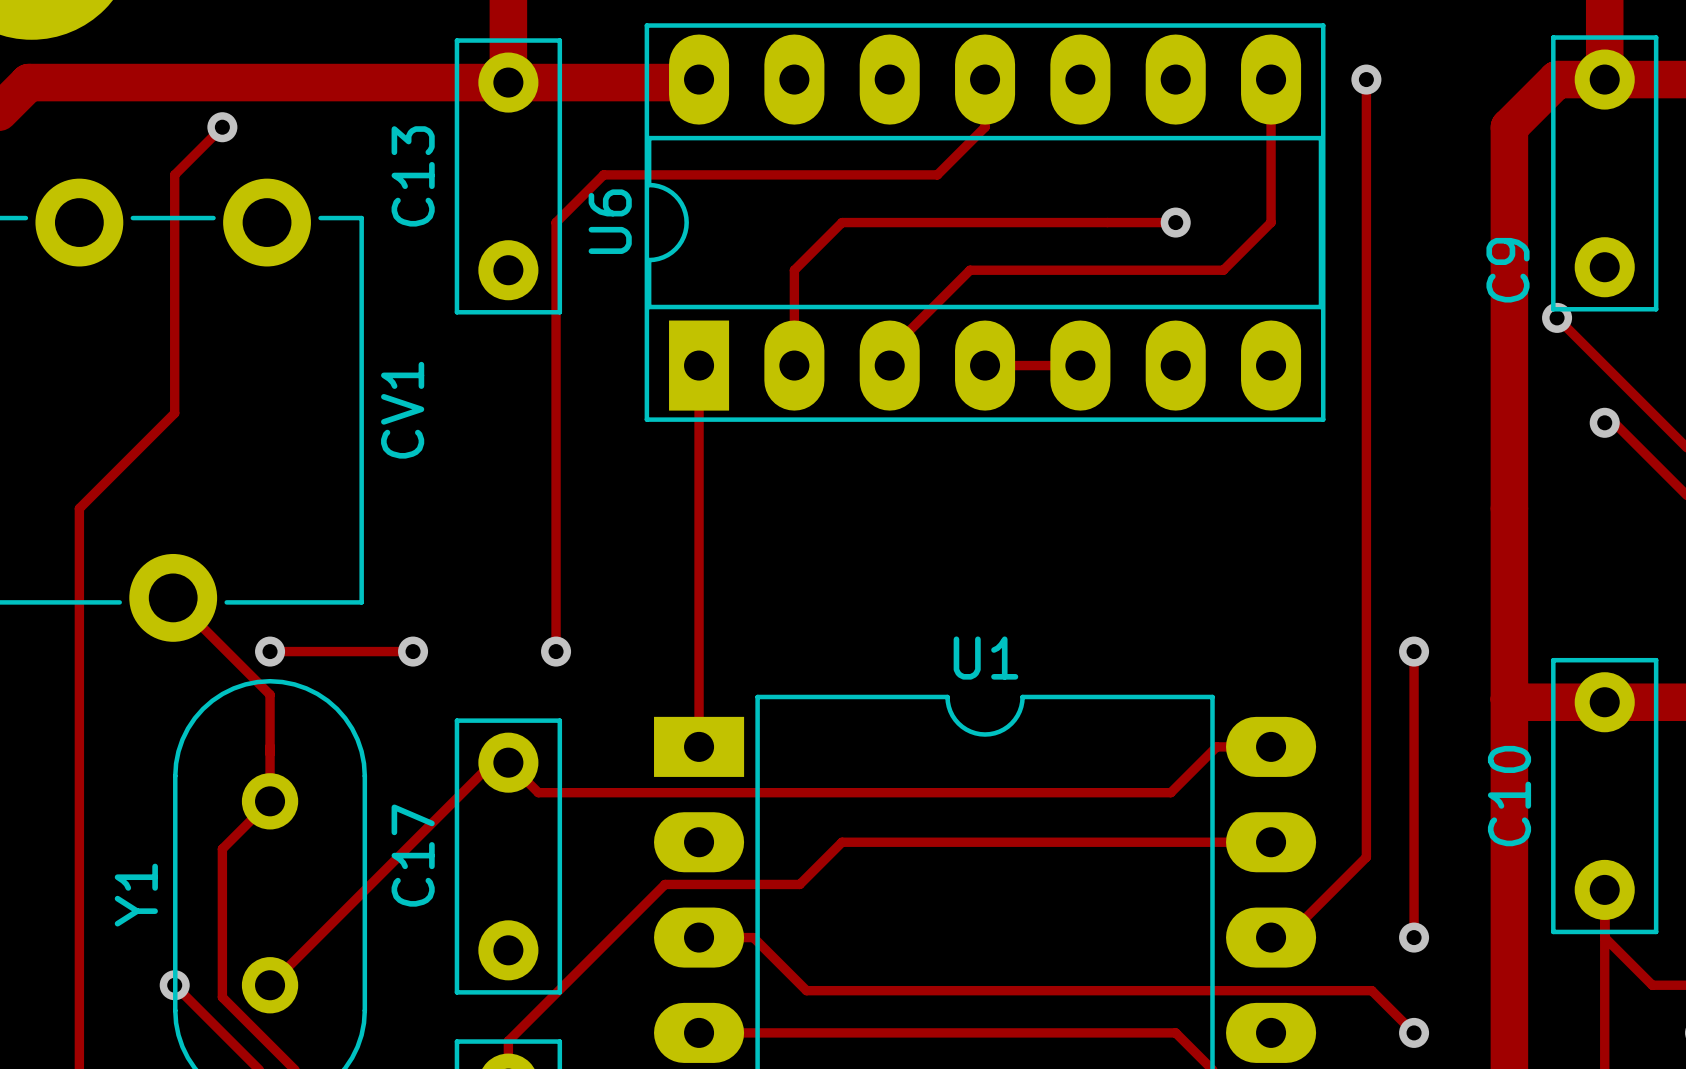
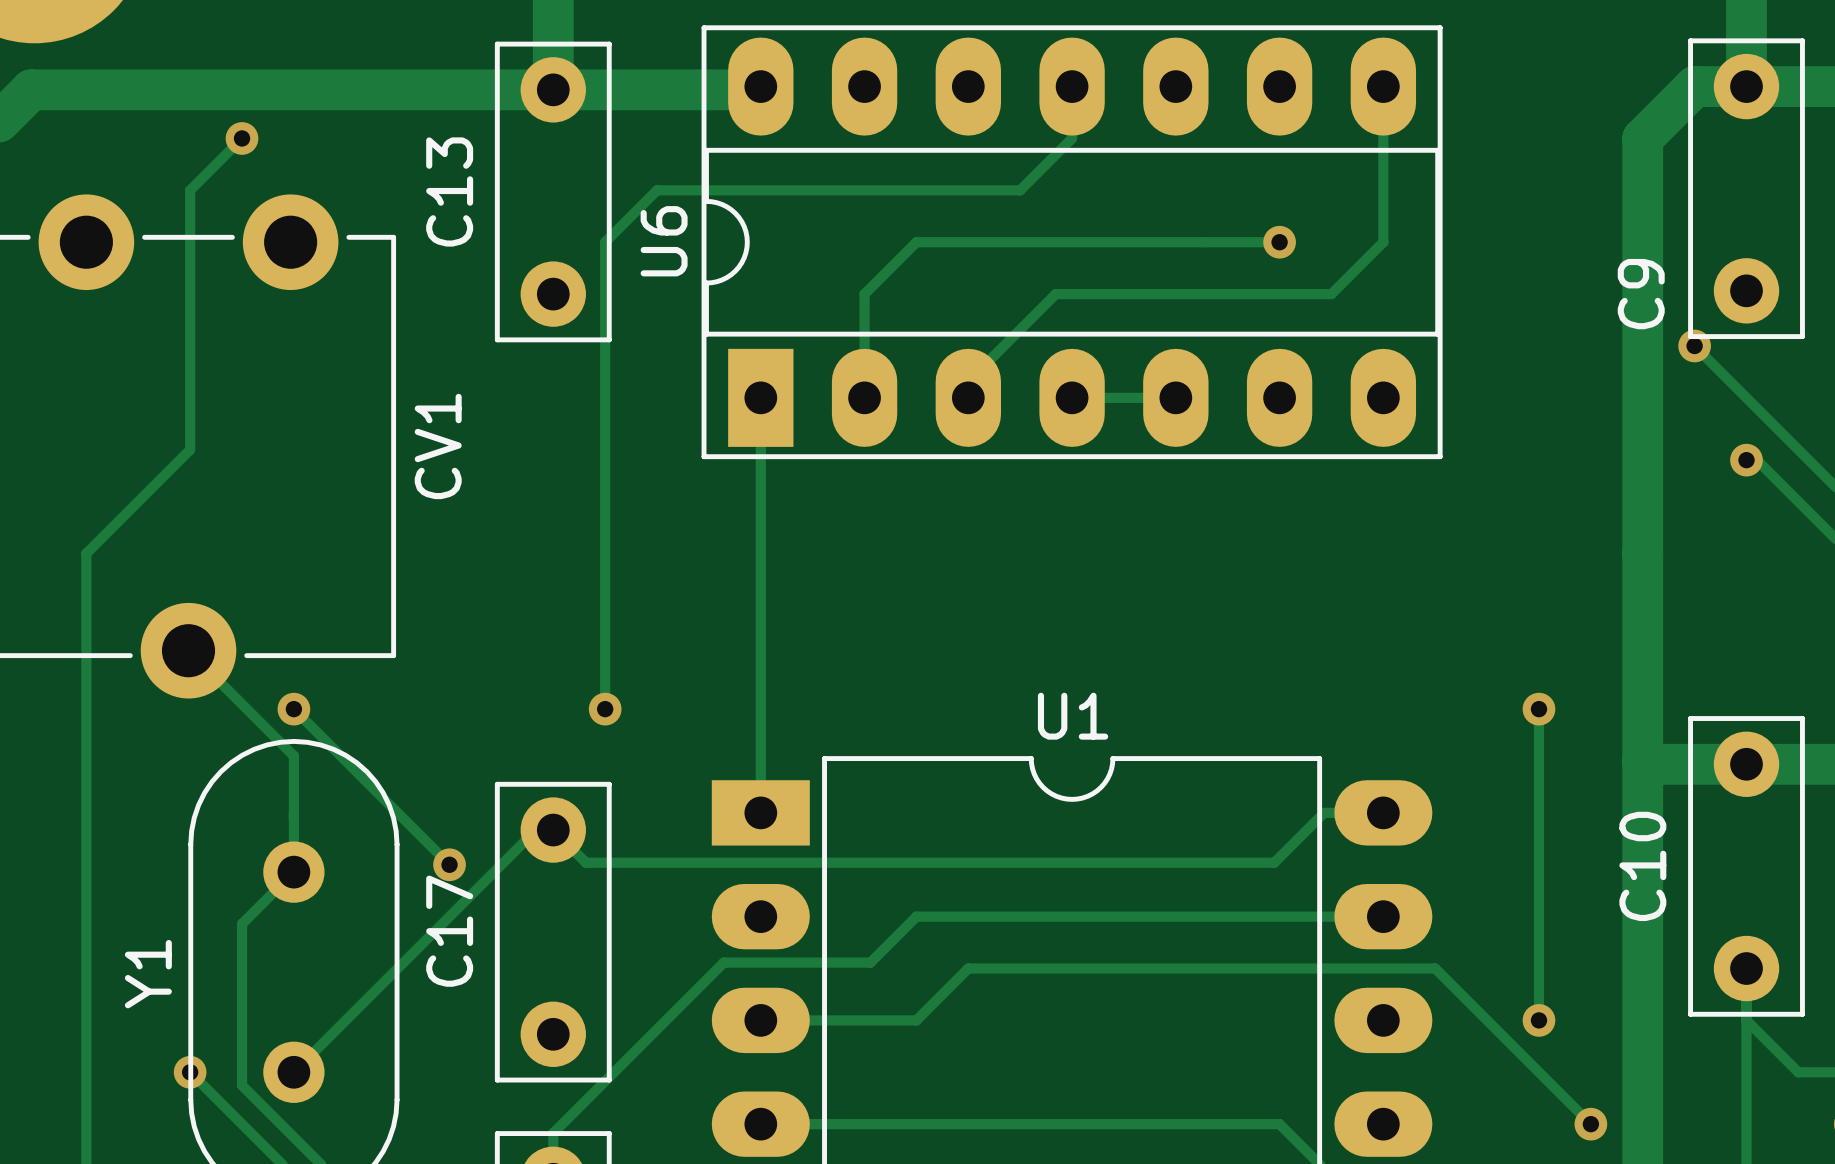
track: (1366, 79) (1366, 857) (1286, 937) (1271, 937) -> none
via: (1366, 79) -> none
track: (270, 651) (413, 651) -> (293, 709) (449, 864)
via position: (413, 651) -> (449, 864)
track: (753, 937) (806, 990) (1371, 990) (1414, 1032) -> (820, 1020) (916, 1020) (968, 968) (1435, 968) (1590, 1124)
via position: (1414, 1032) -> (1590, 1124)

